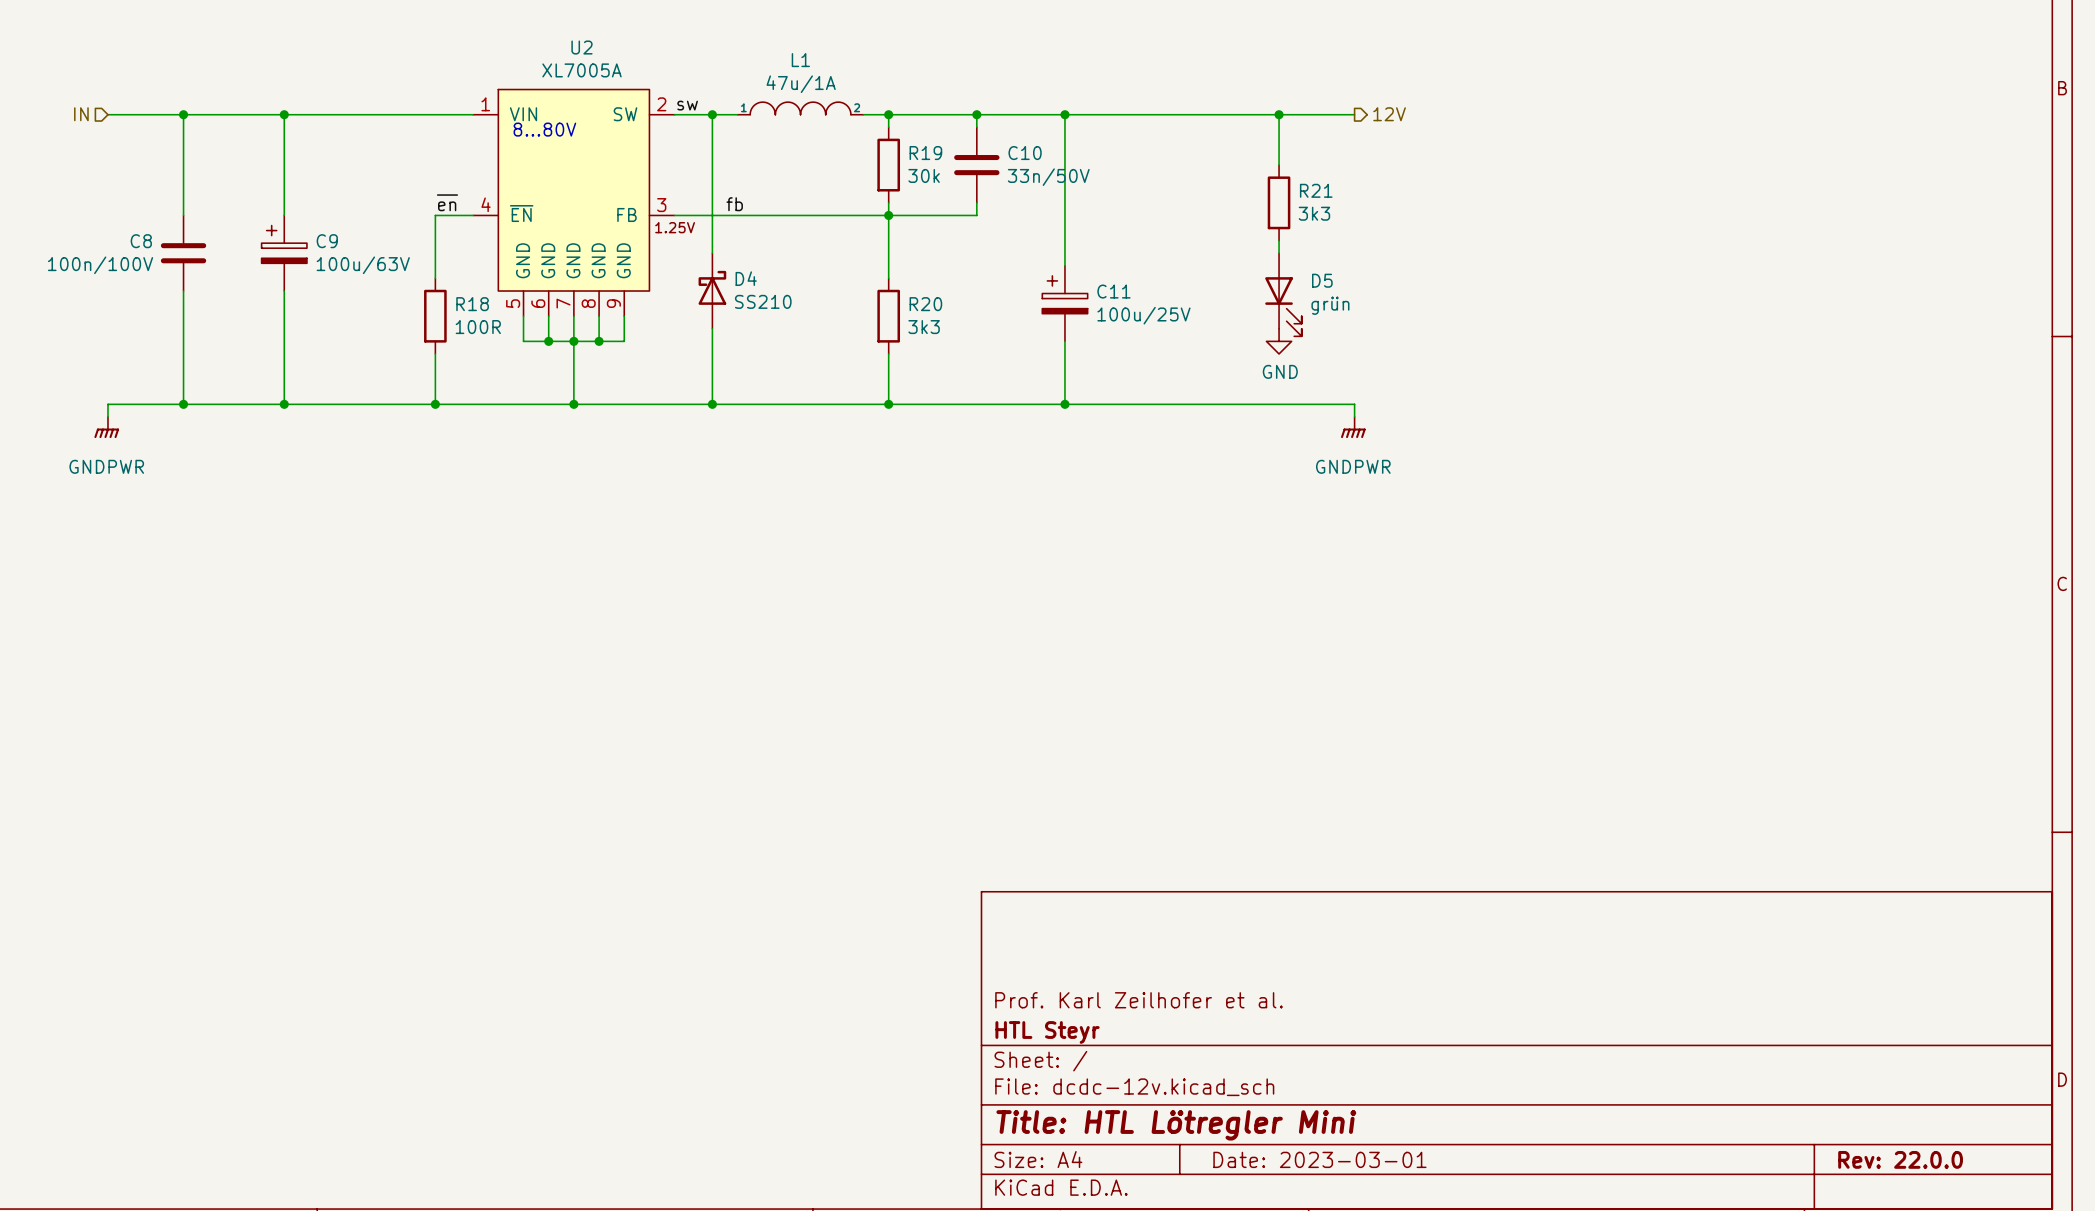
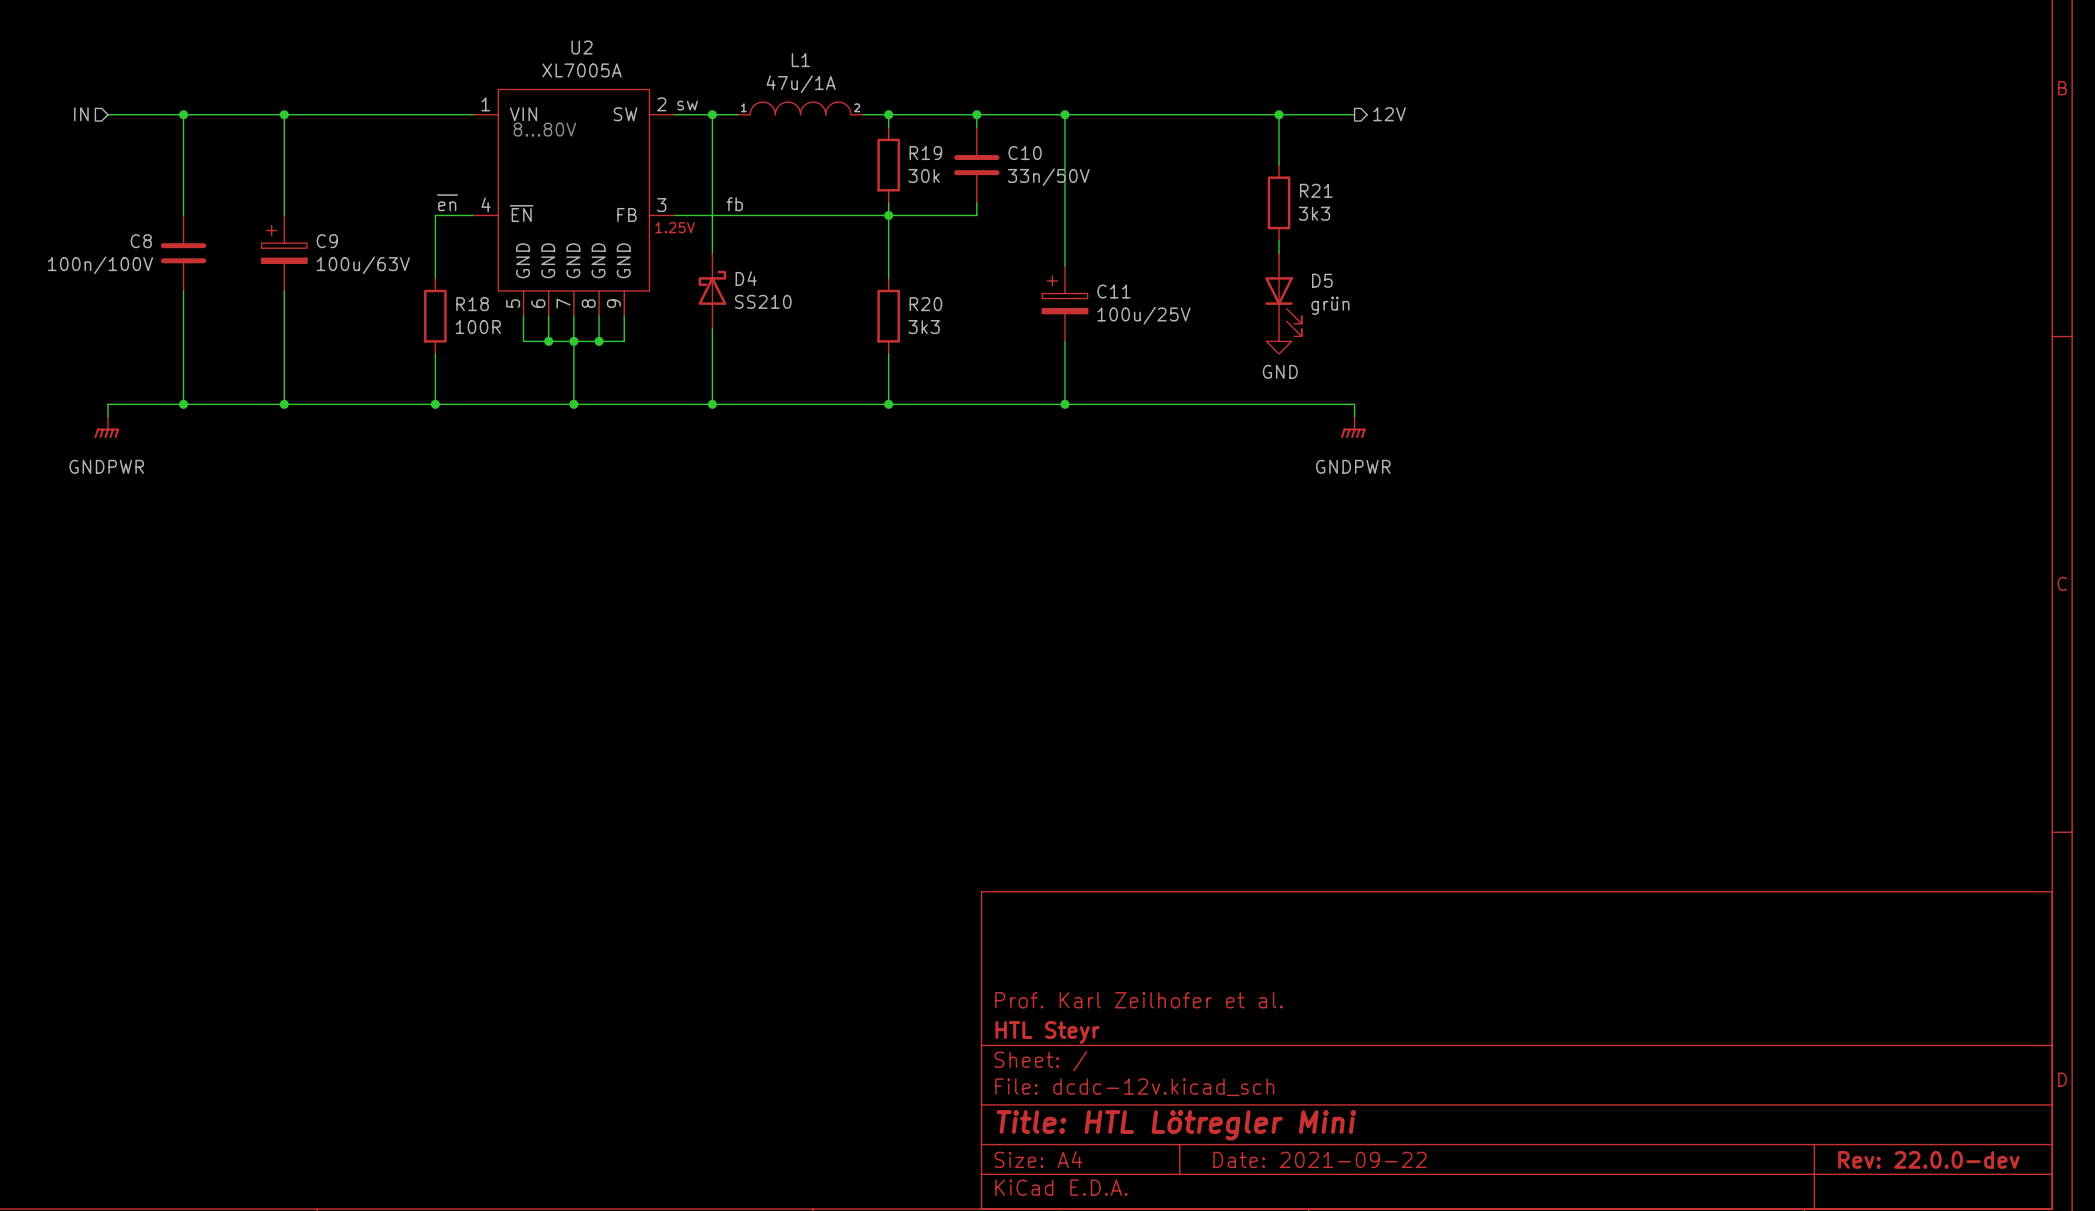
title block: Date: 2023-03-01 (1319, 1159) -> Date: 2021-09-22 (1319, 1159)
title block: Rev: 22.0.0 (1900, 1159) -> Rev: 22.0.0-dev (1928, 1159)

